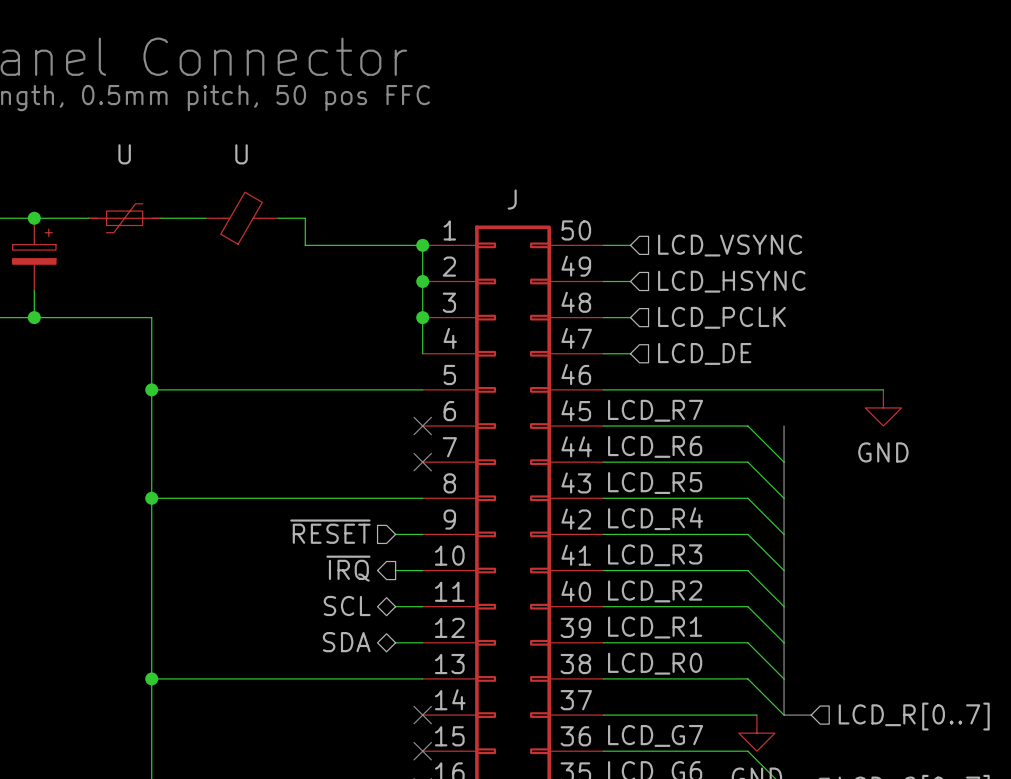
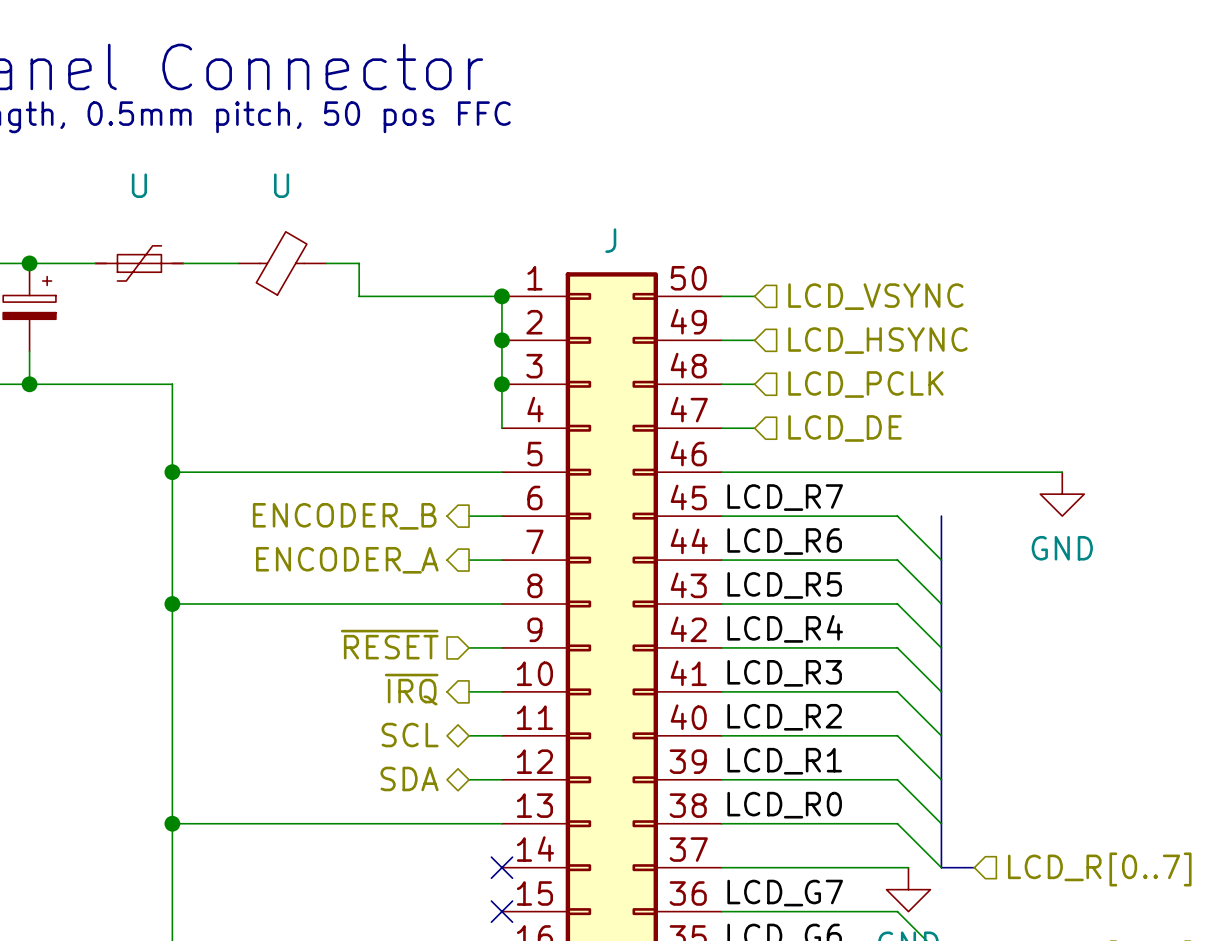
hierarchical label: none -> ENCODER_B (344, 516)
wire: none -> (469, 516) (501, 516)
no-connect mark: (422, 426) -> none
hierarchical label: none -> ENCODER_A (347, 560)
wire: none -> (469, 560) (501, 560)
no-connect mark: (422, 462) -> none

